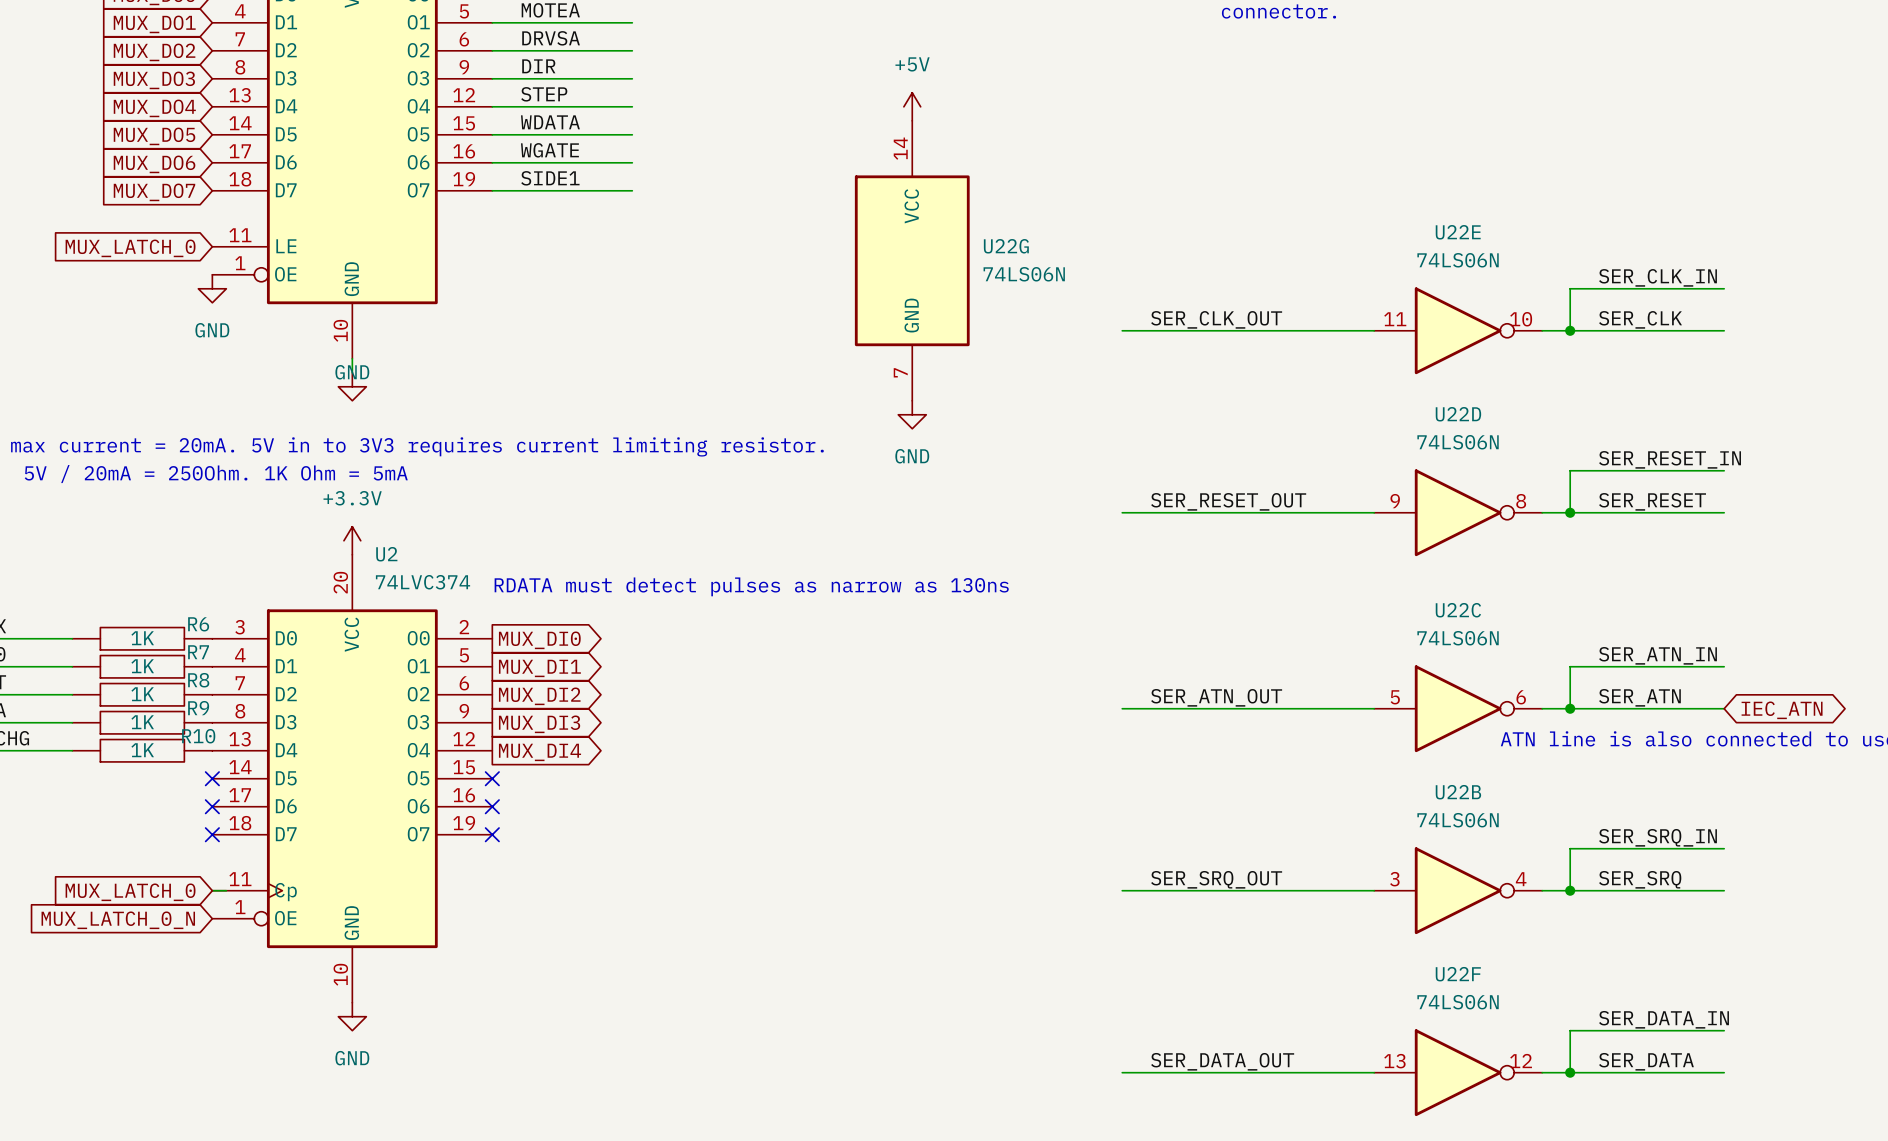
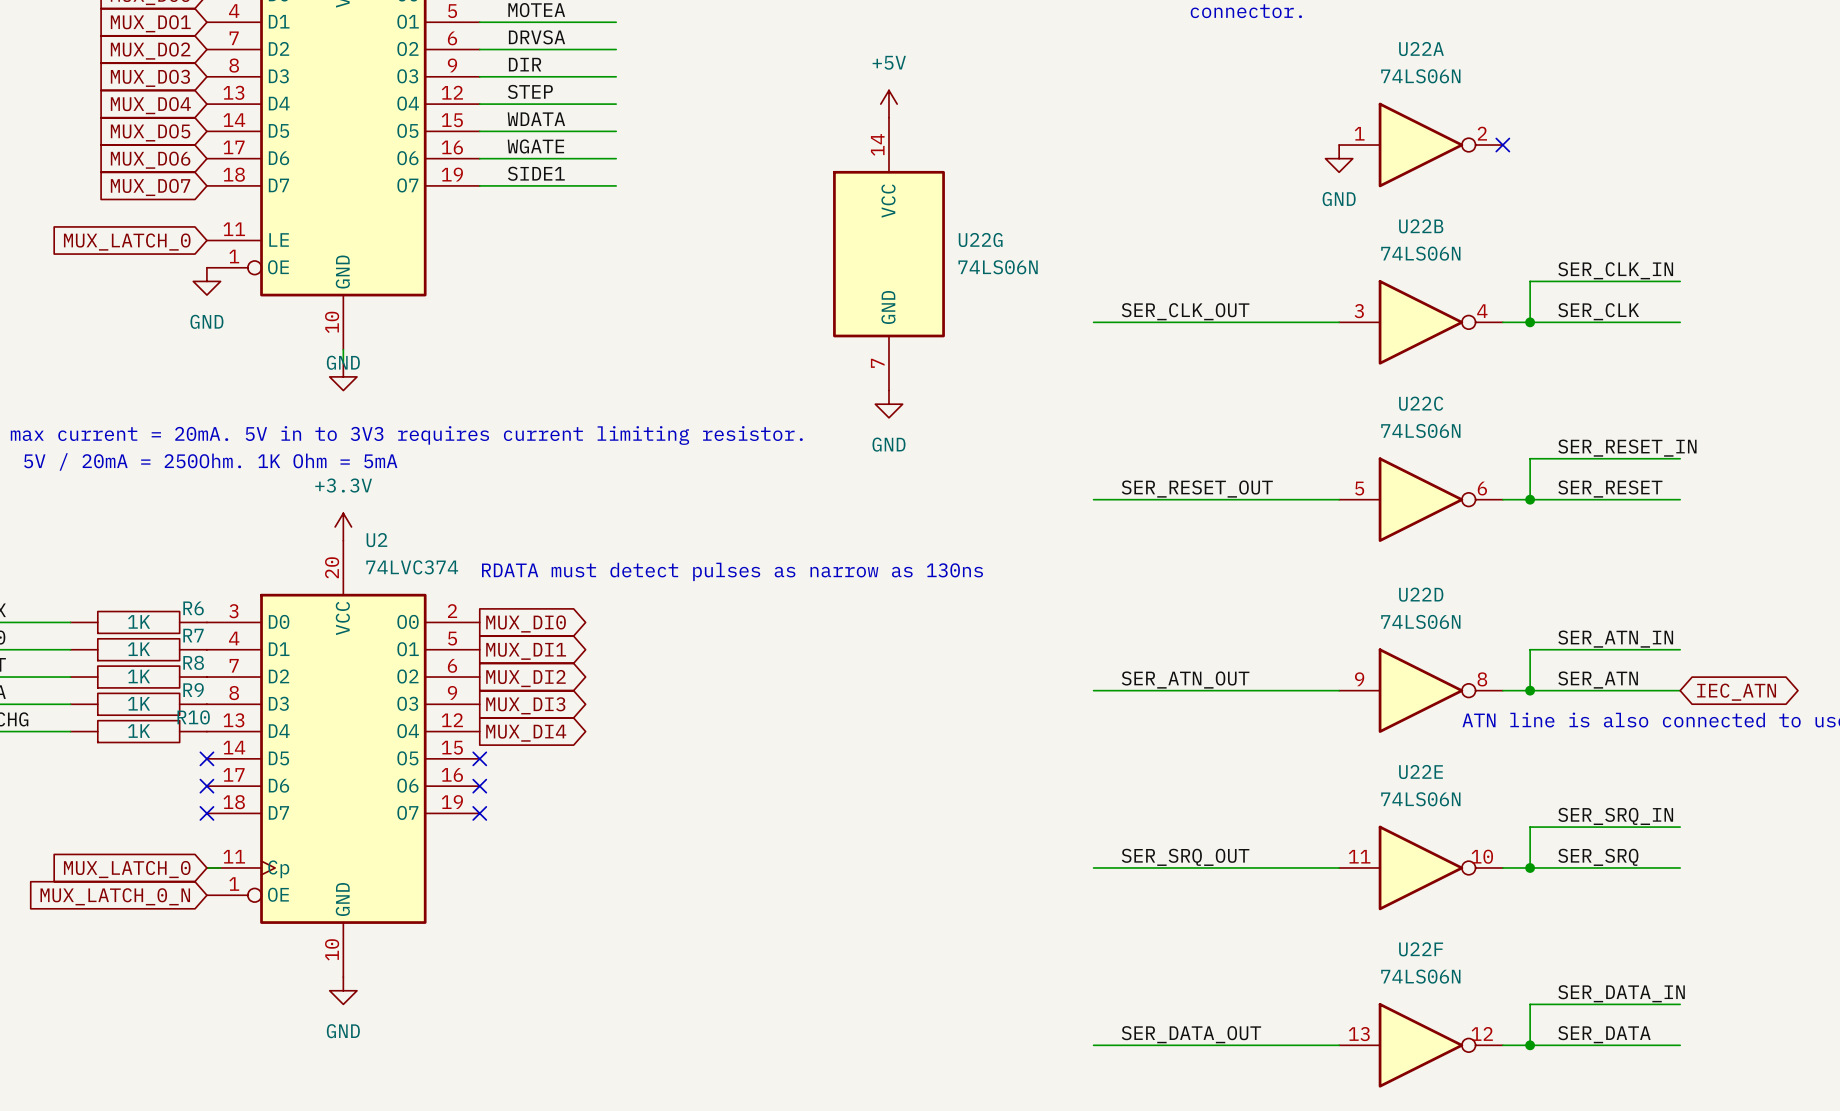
U22A: none -> 74LS06N (1420, 145)
no-connect mark: none -> (1502, 145)
power symbol: none -> GND (1339, 158)
U22E position: (1458, 330) -> (1420, 867)
U22D position: (1458, 512) -> (1420, 690)
U22C position: (1458, 708) -> (1420, 499)
U22B position: (1458, 890) -> (1420, 322)

